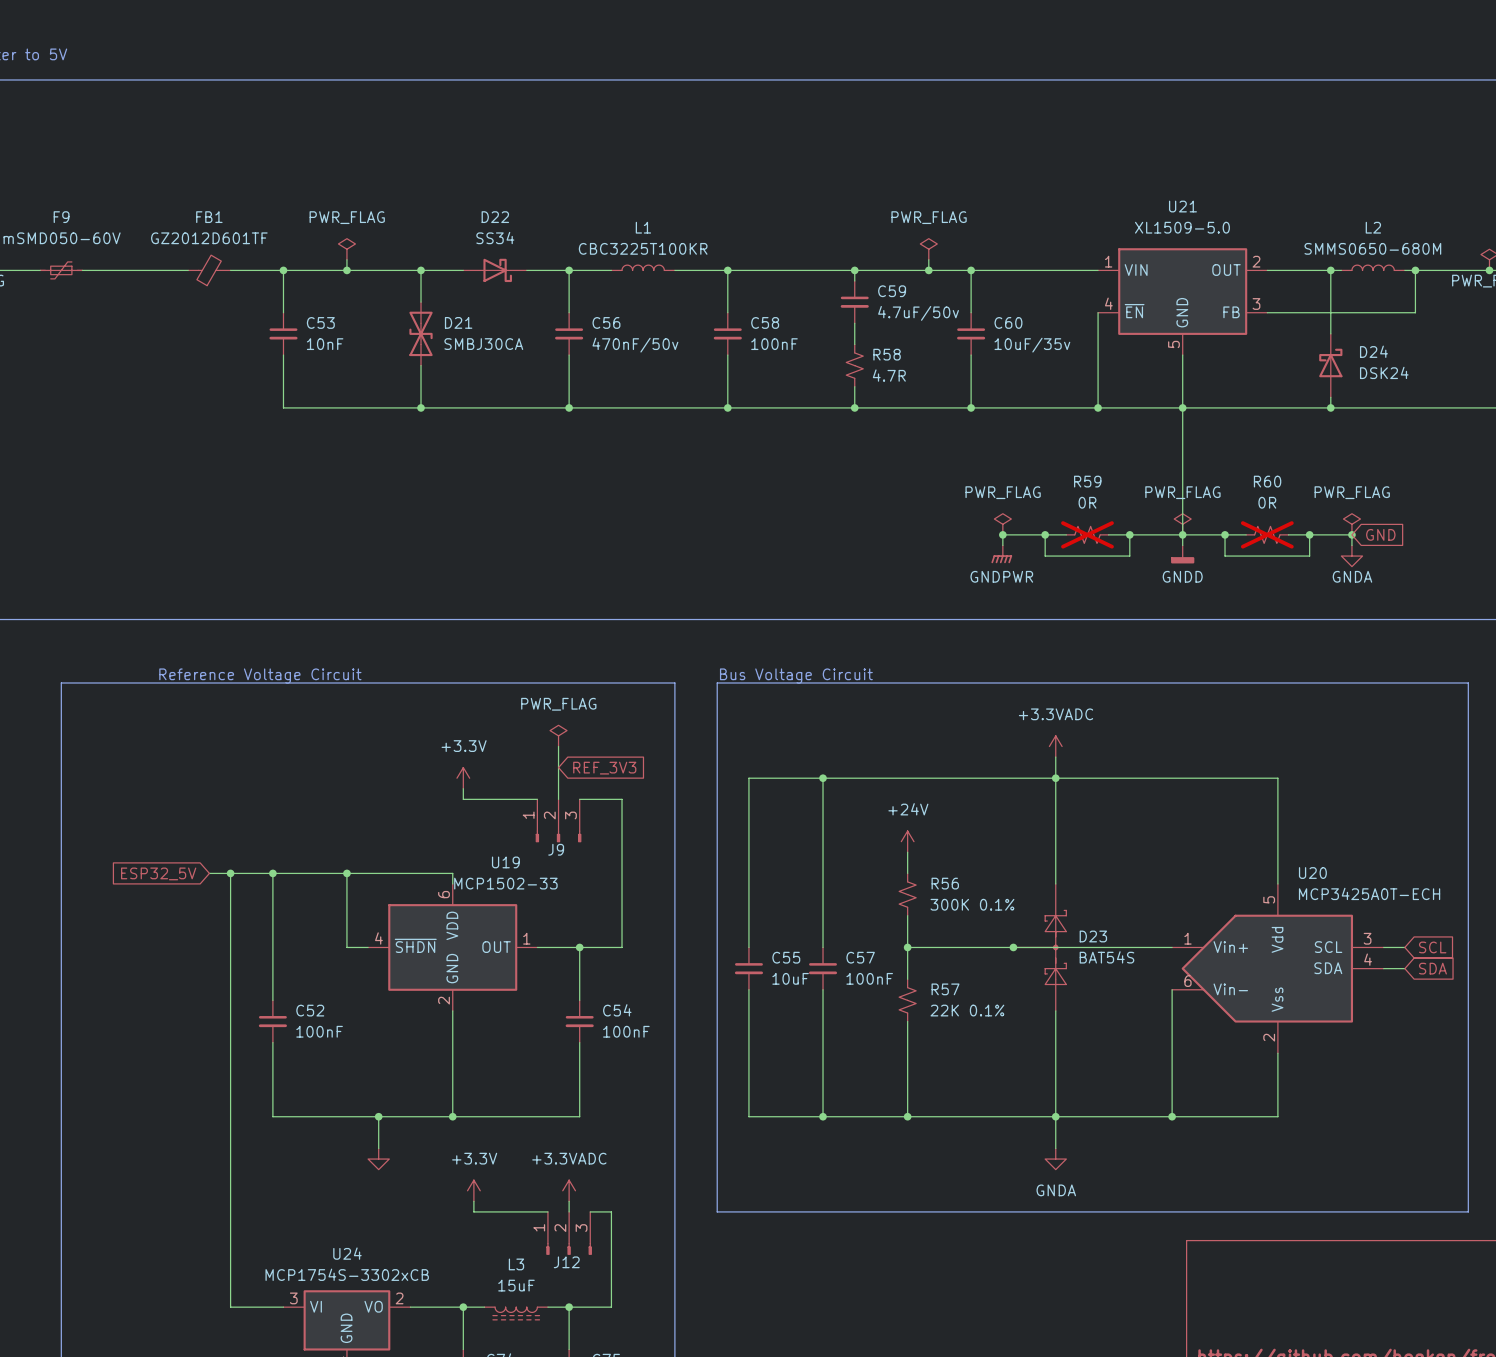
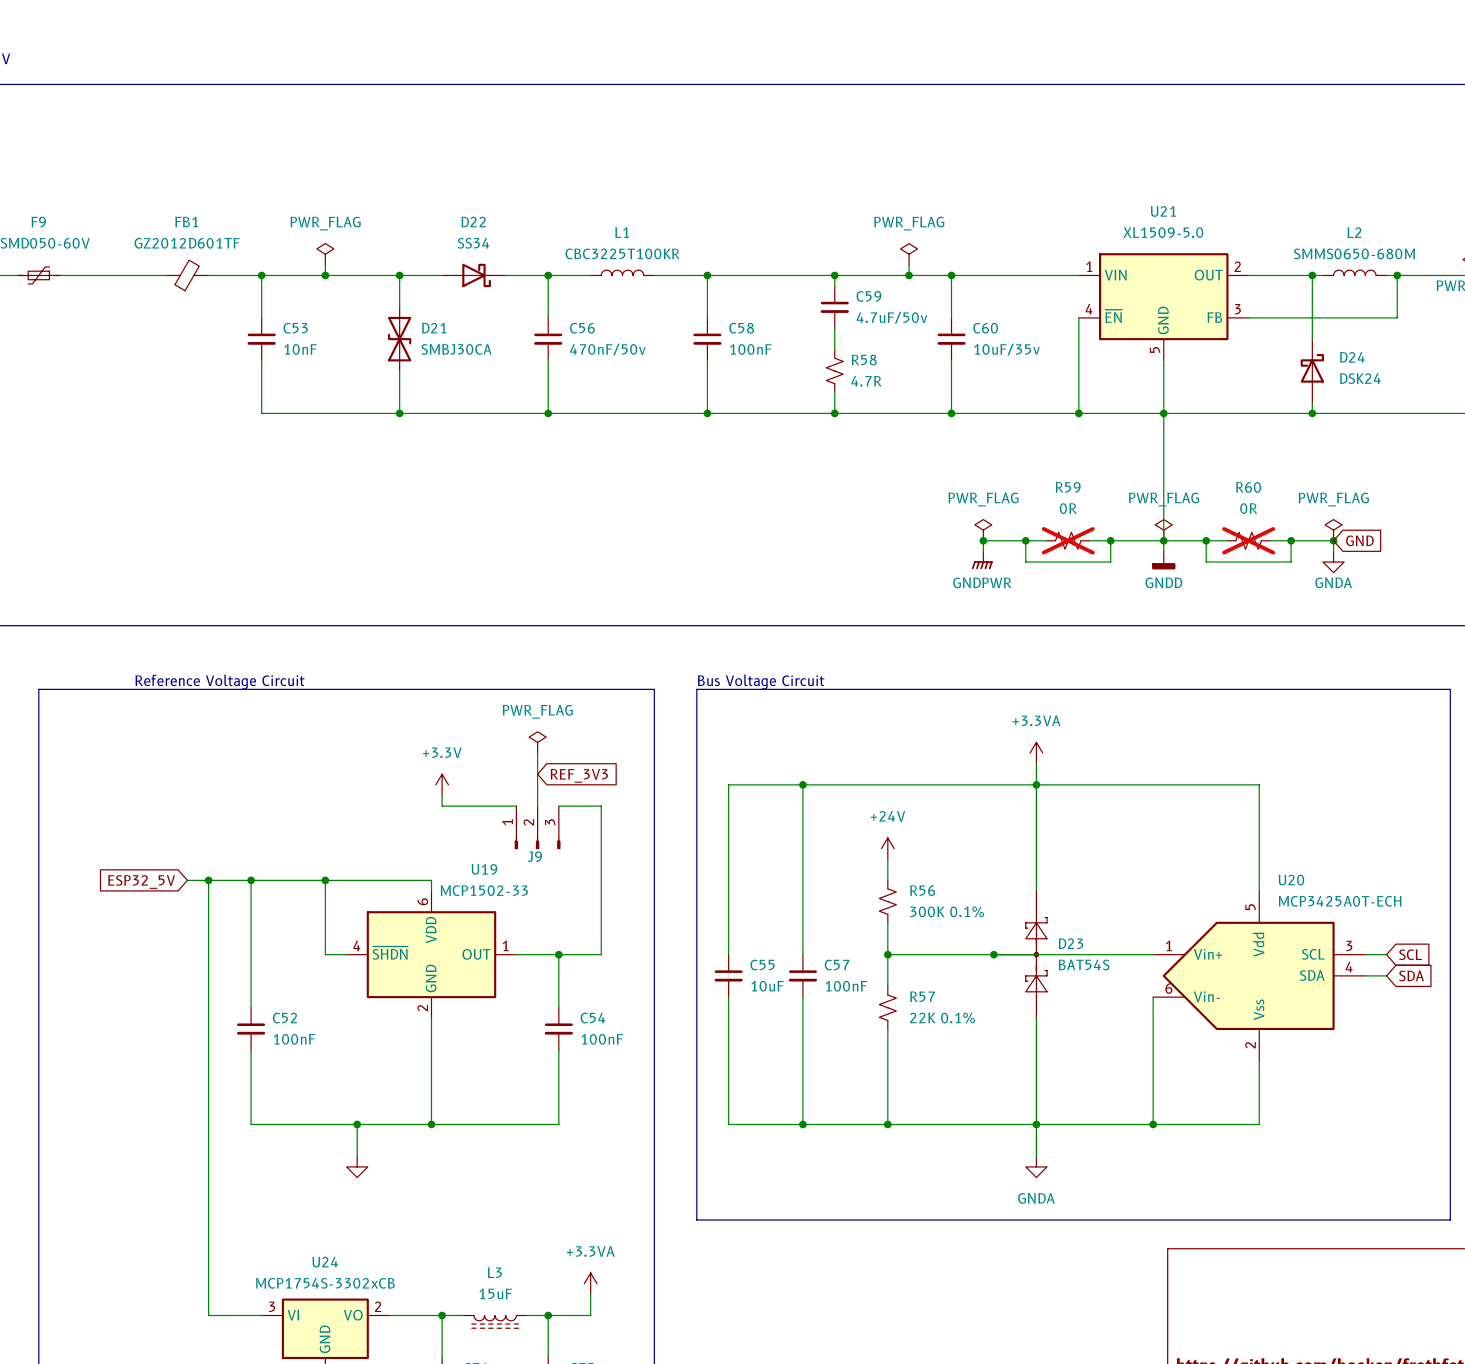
power symbol: +3.3VADC (1055, 746) -> +3.3VA (1036, 753)
power symbol: +3.3V (473, 1190) -> none
power symbol: +3.3VADC (569, 1190) -> none
wire: (473, 1201) (473, 1211) (547, 1211) -> none
wire: (569, 1201) (569, 1211) -> none
wire: (590, 1211) (611, 1211) (611, 1285) -> none
J12: (569, 1233) -> none
power symbol: none -> +3.3VA (590, 1283)

